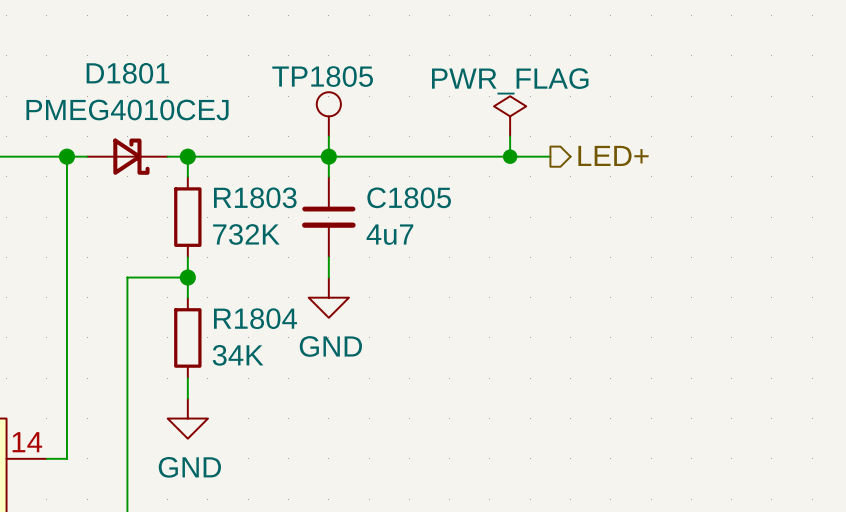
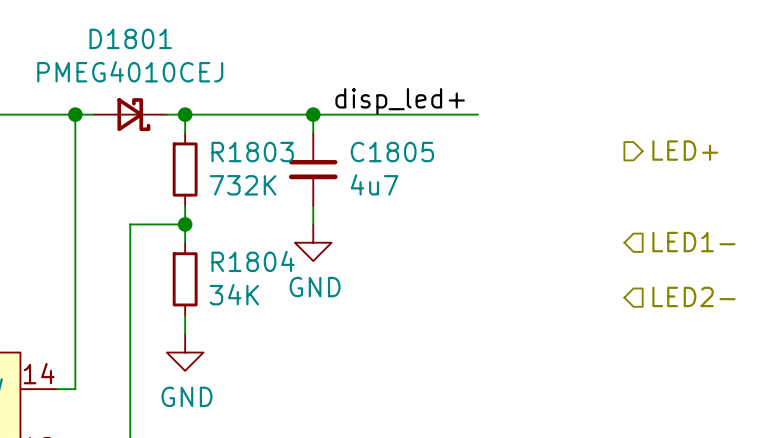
TP1805: (328, 114) -> none
power symbol: PWR_FLAG (510, 116) -> none
wire: (328, 136) (328, 156) -> none
wire: (510, 136) (510, 156) (550, 156) -> none
label: none -> disp_led+ (400, 101)
hierarchical label position: LED+ (613, 155) -> LED+ (685, 150)
junction: (510, 156) -> none
hierarchical label: none -> LED1- (693, 242)
hierarchical label: none -> LED2- (693, 296)

